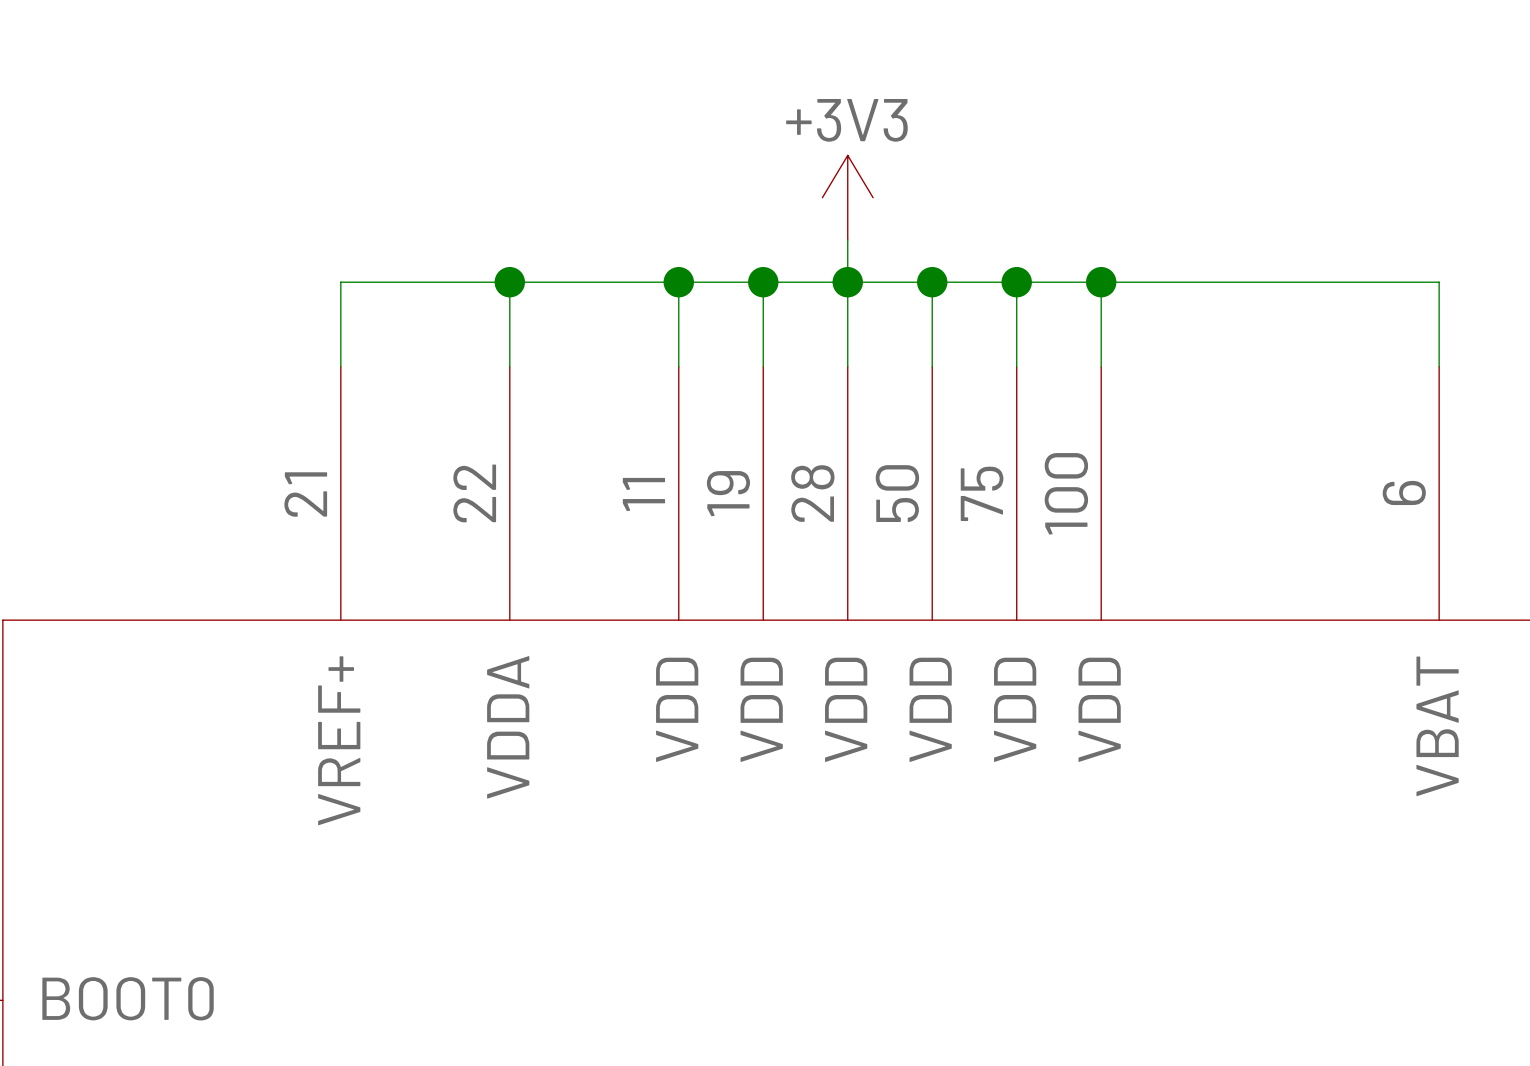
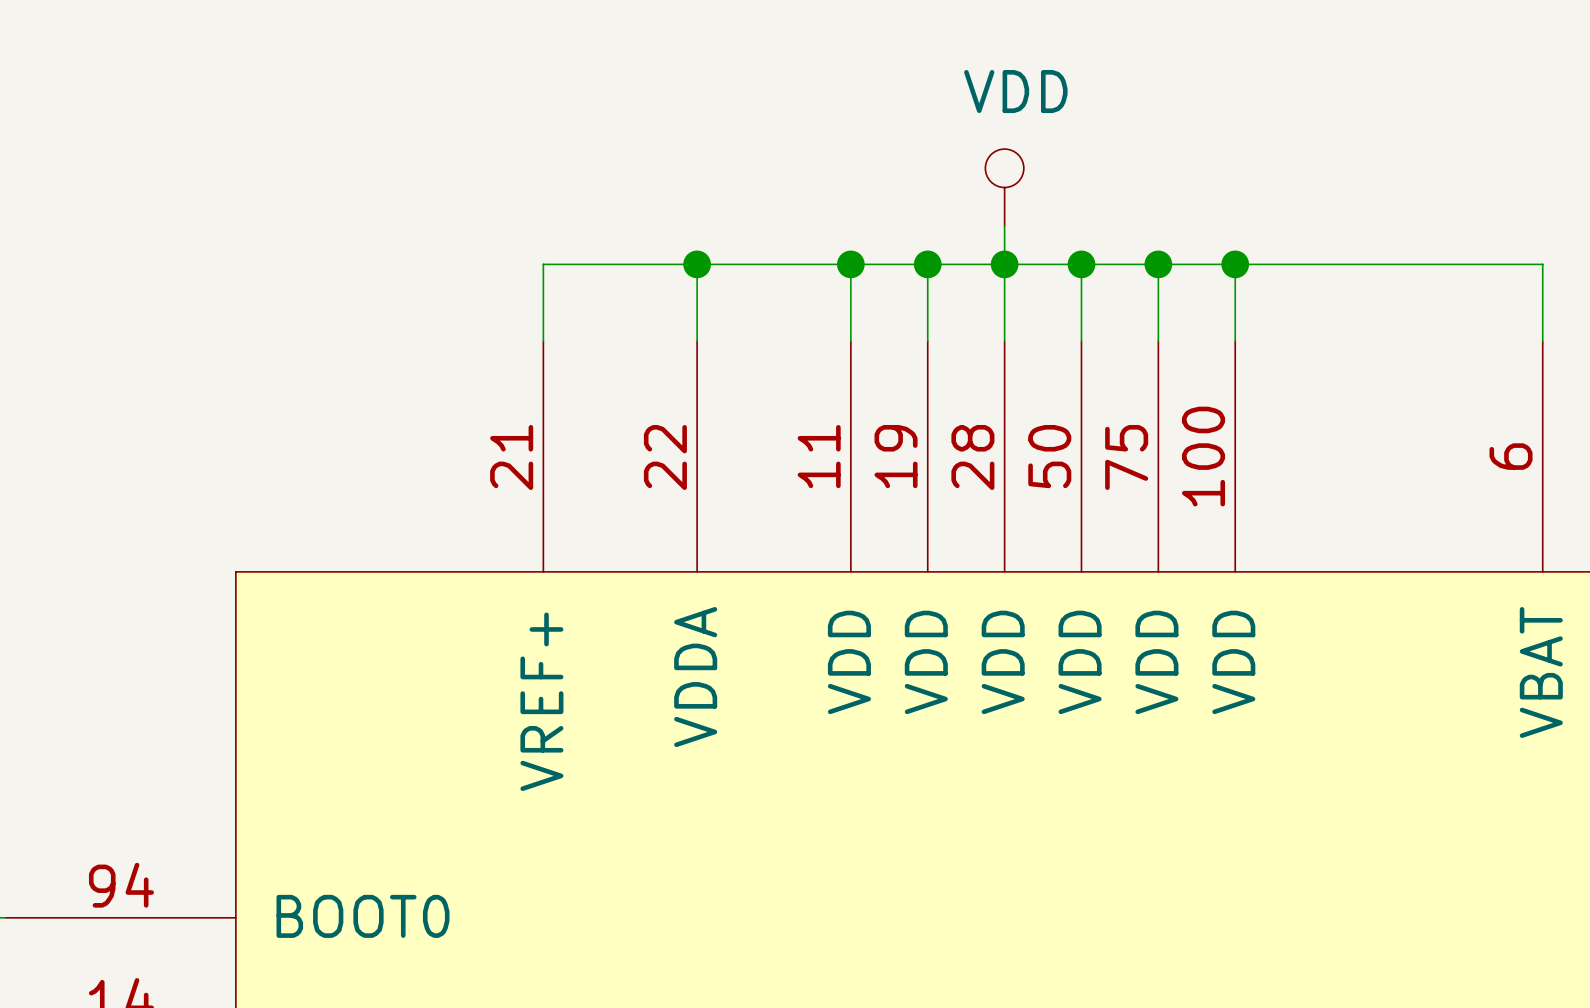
power symbol: +3V3 (847, 197) -> VDD (1004, 187)

